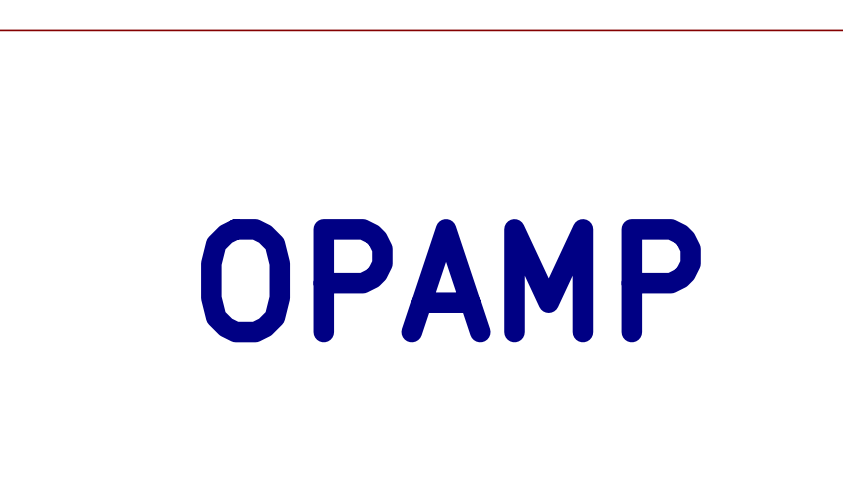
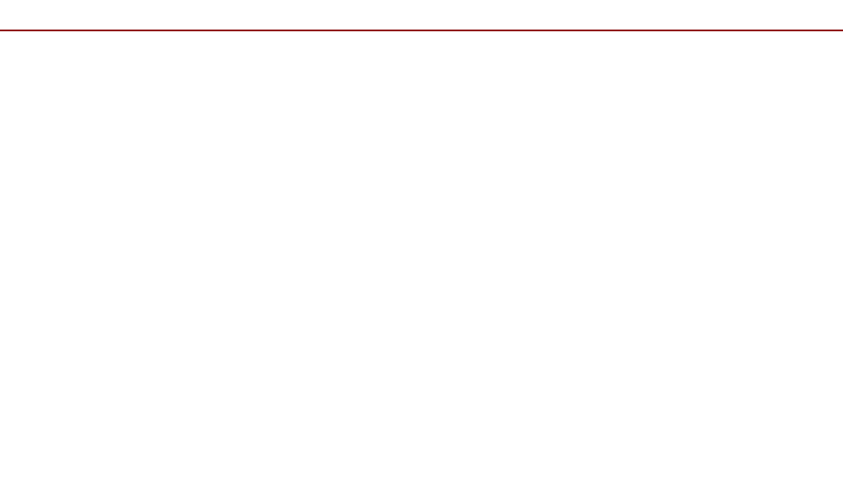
text: OPAMP (450, 280) -> none

